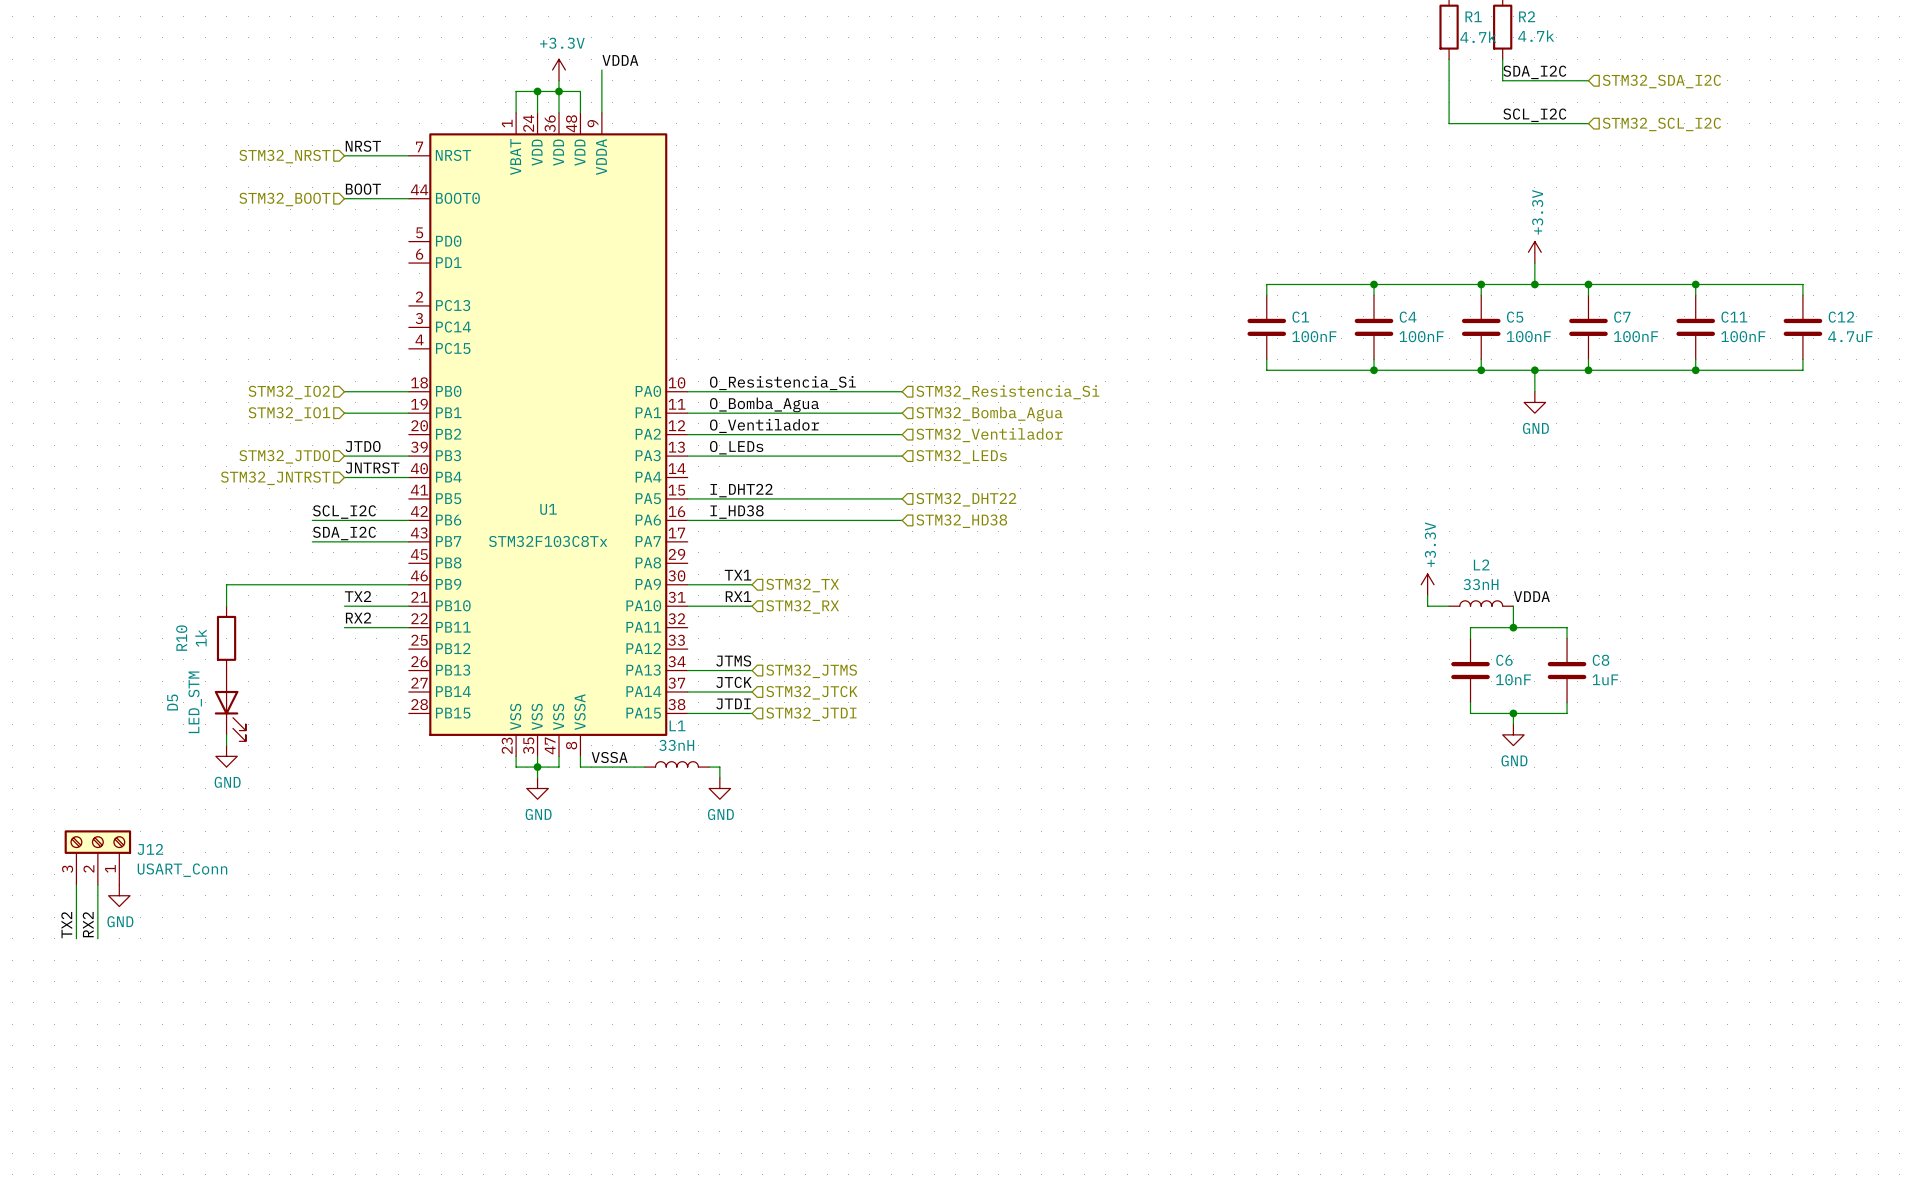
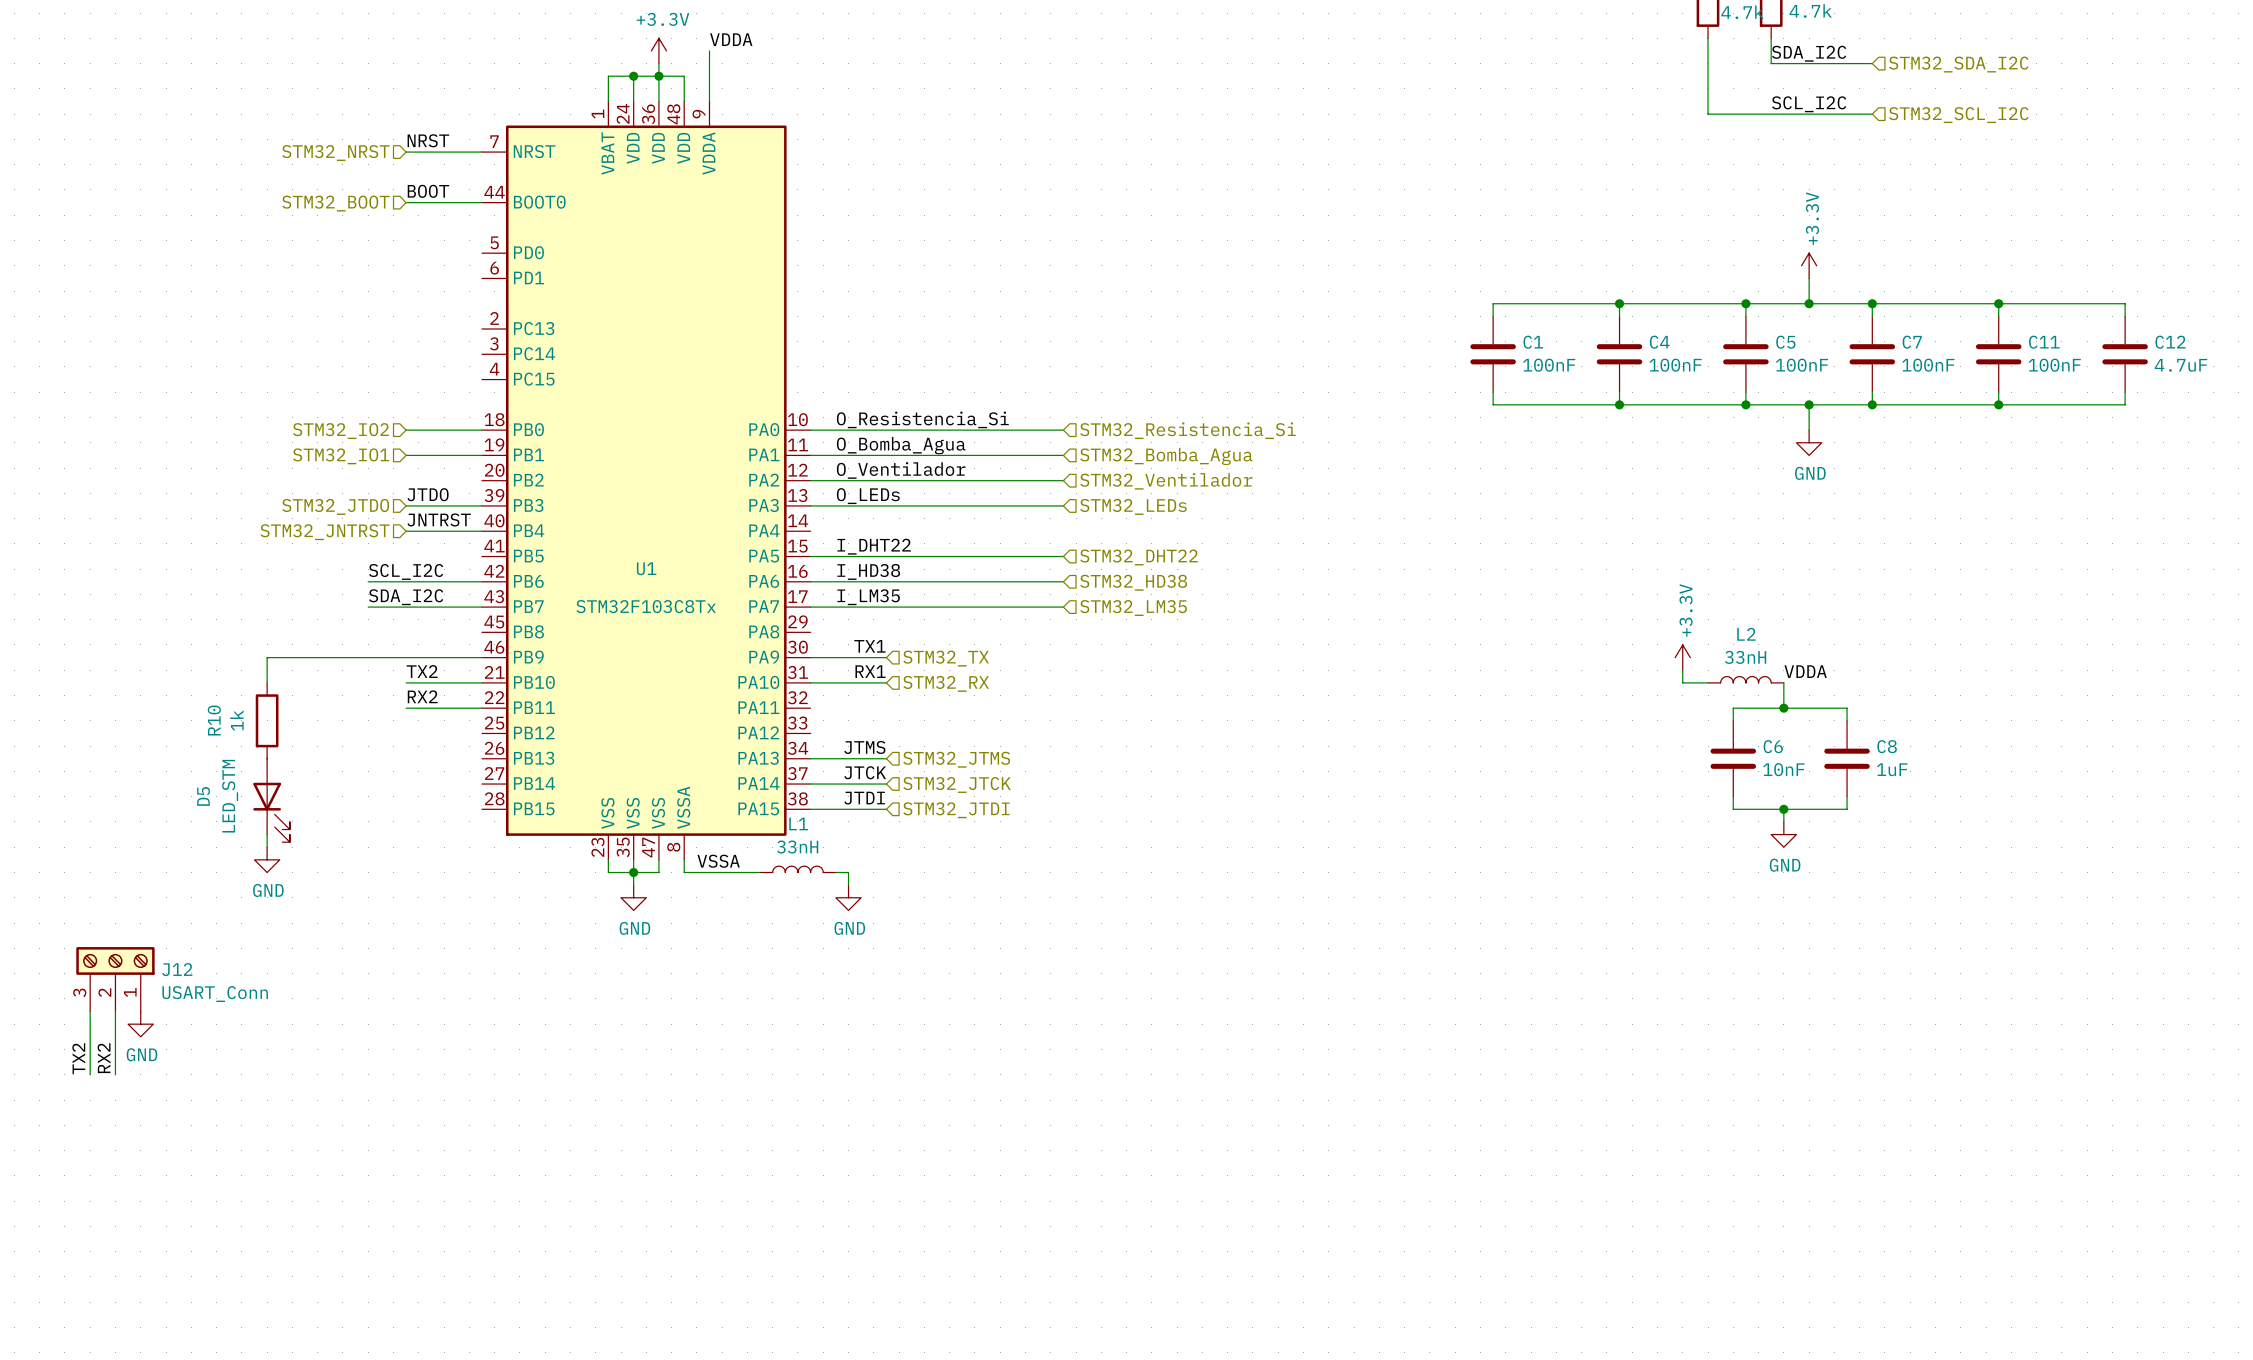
label: none -> I_LM35 (868, 597)
wire: none -> (810, 607) (1063, 607)
hierarchical label: none -> STM32_LM35 (1133, 608)

